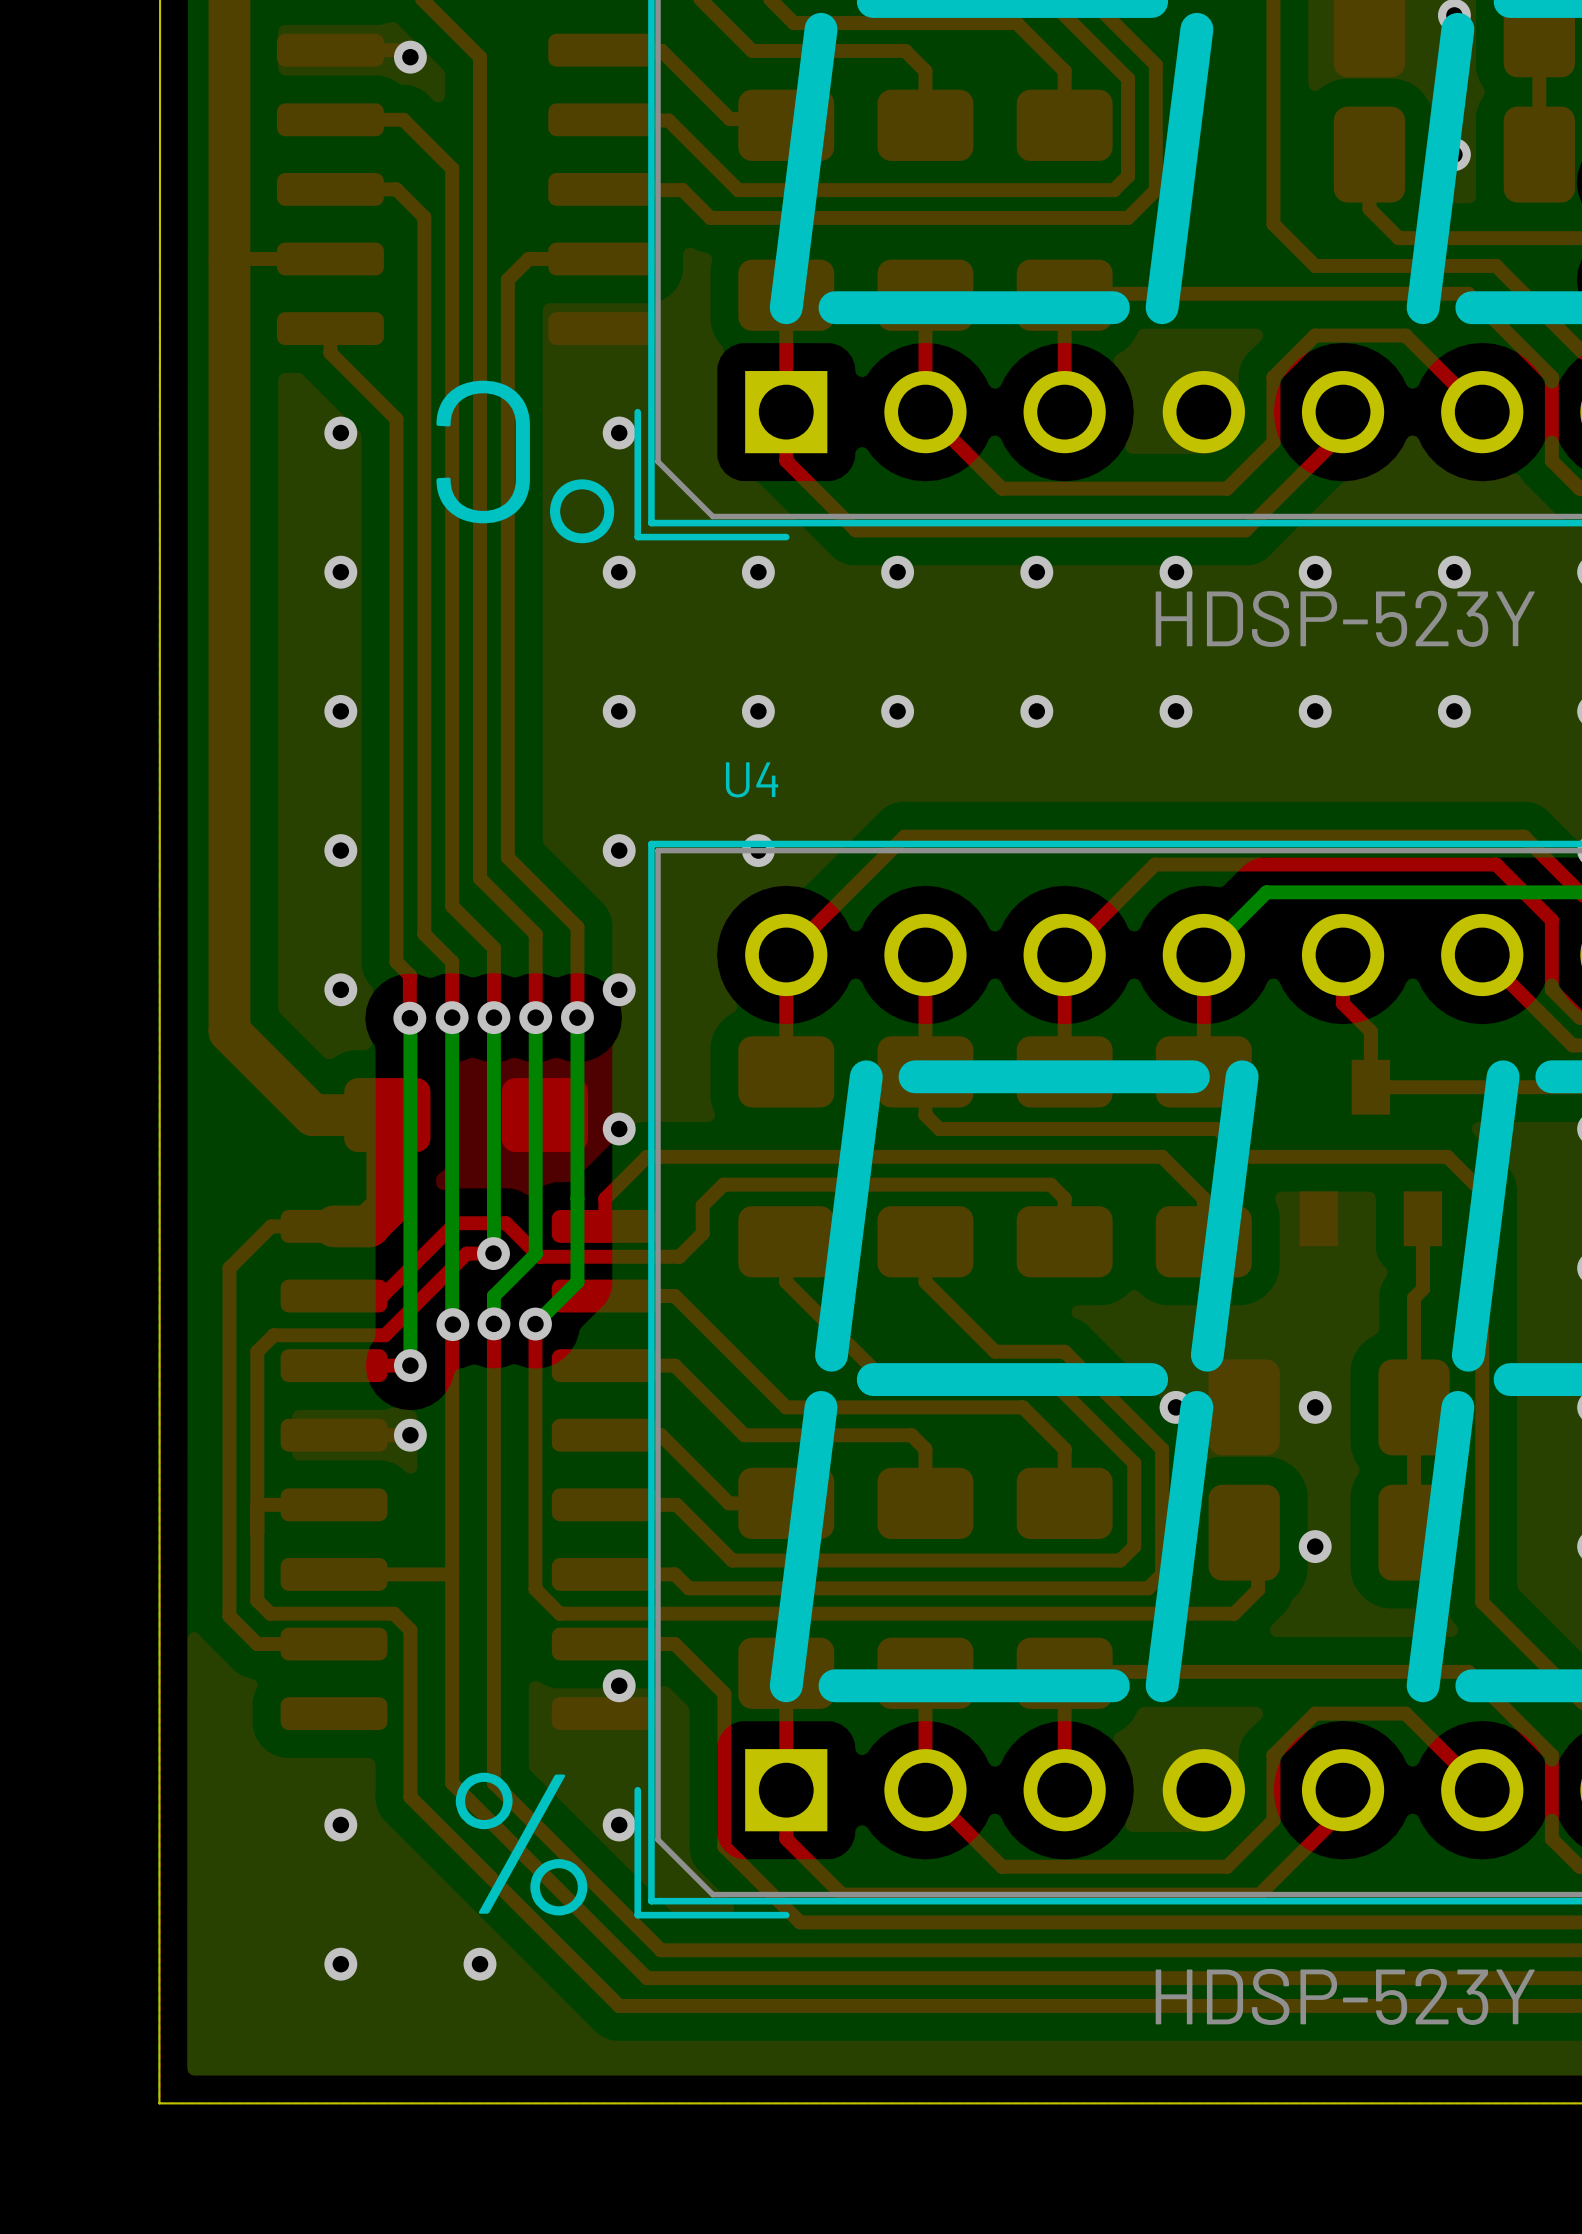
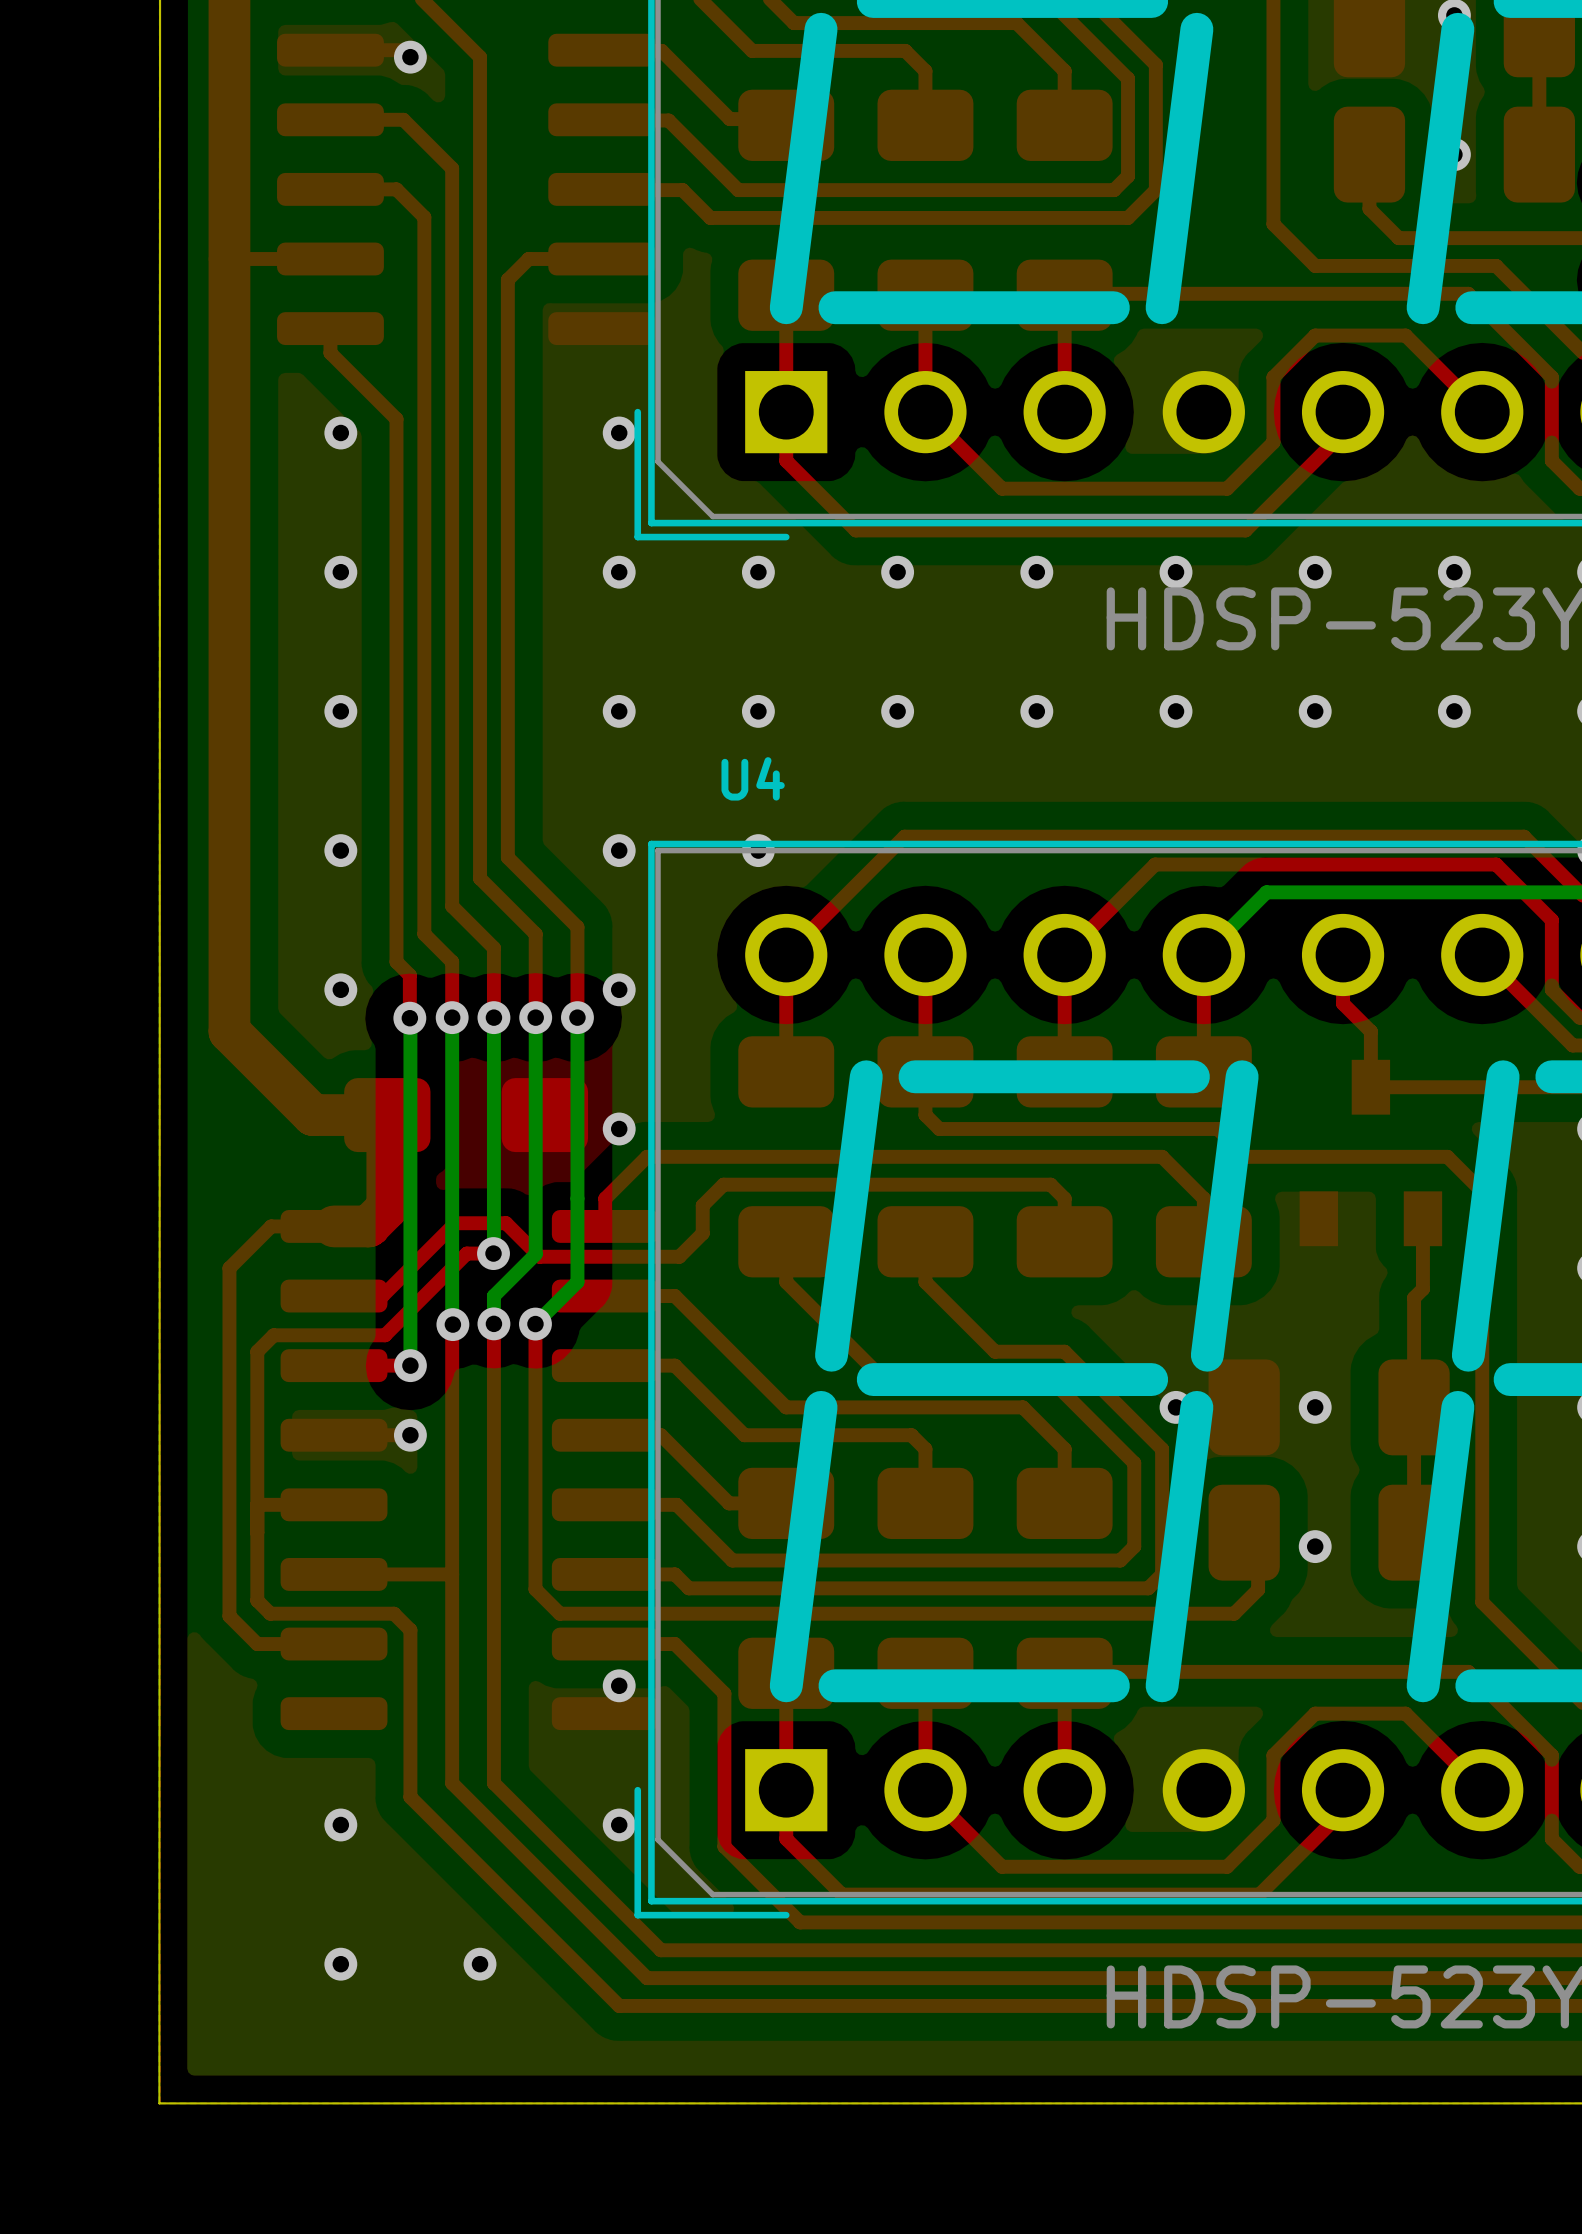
text: °C (525, 461) -> none
text: % (521, 1844) -> none

